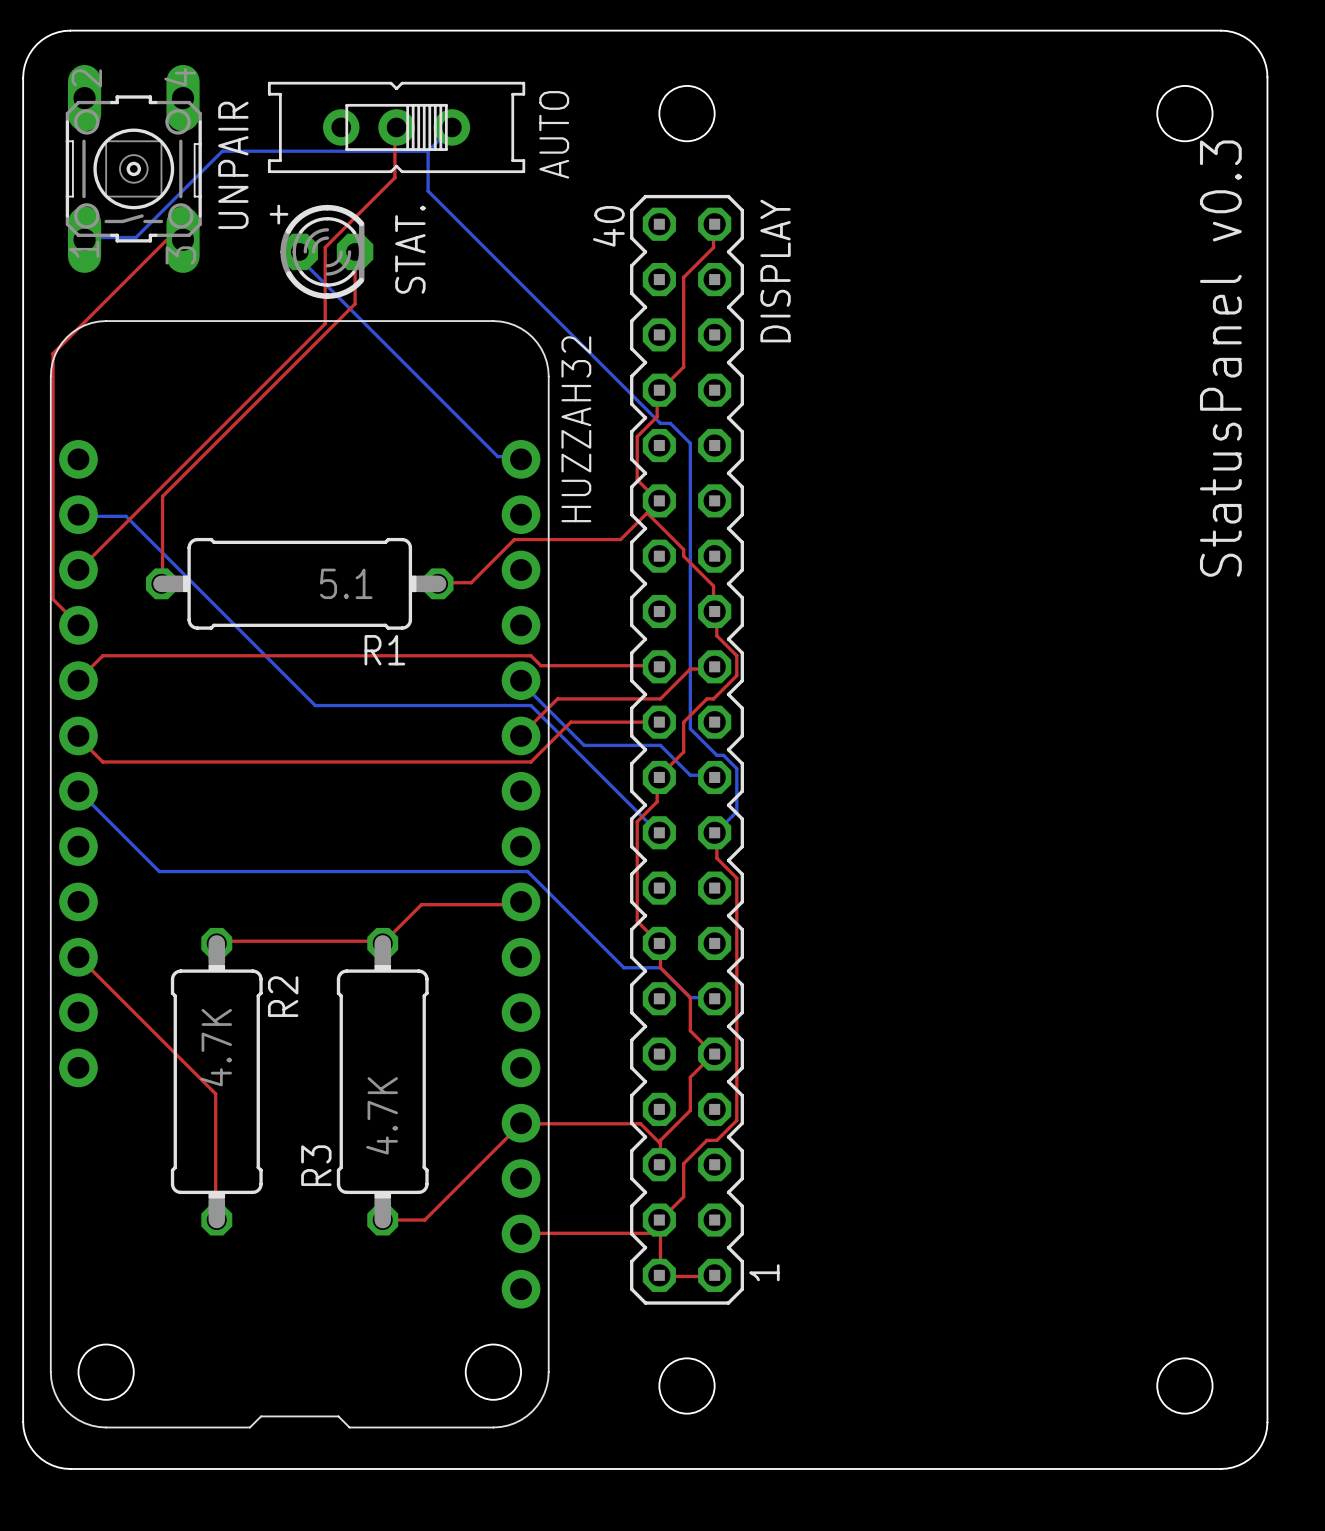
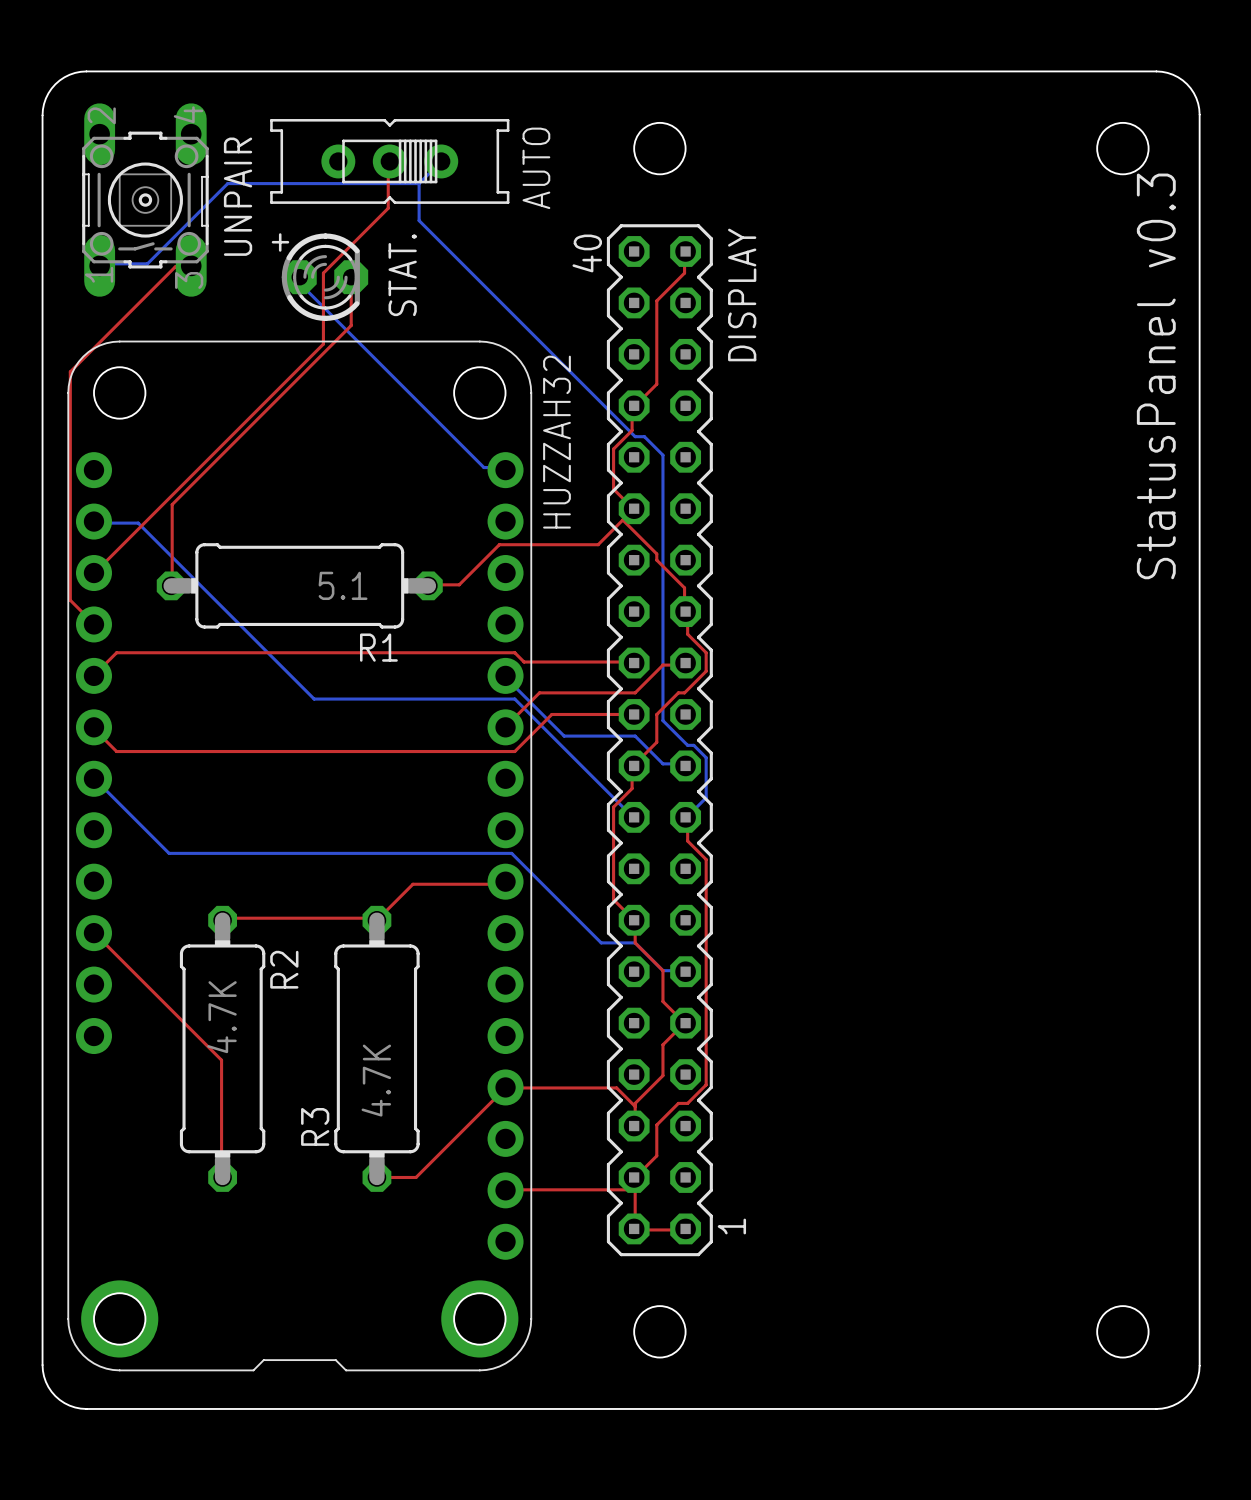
part footprint: [50, 321, 549, 1428] -> [68, 341, 532, 1371]

